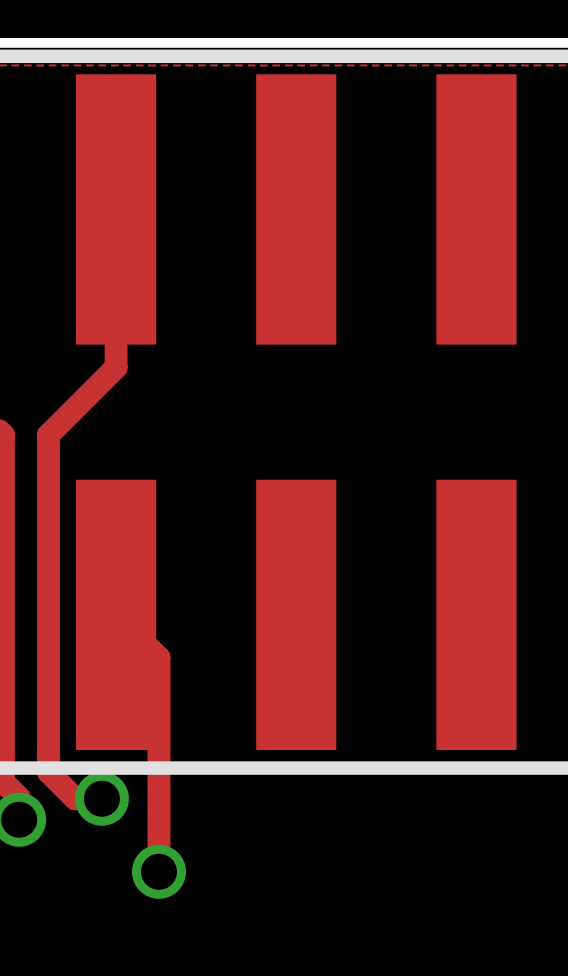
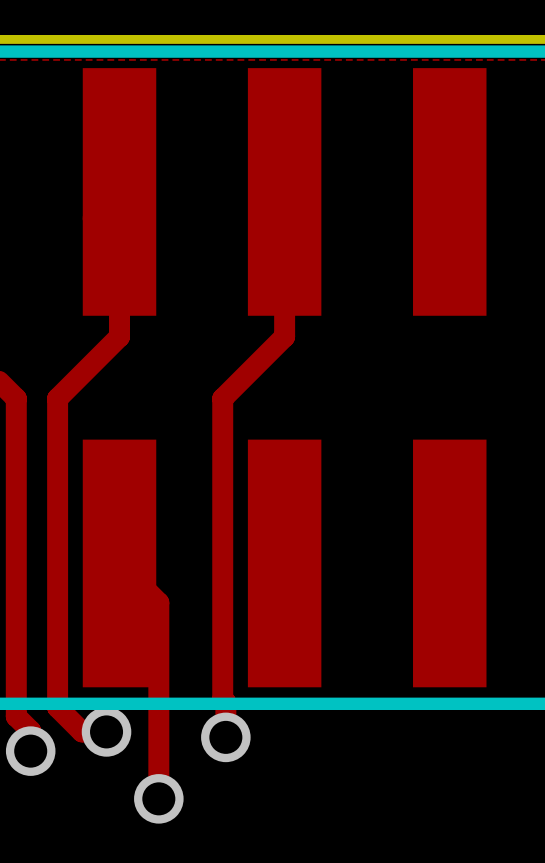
track: none -> (284, 191) (284, 336) (222, 398) (222, 699) (225, 702) (225, 737)
via: none -> (225, 737)

